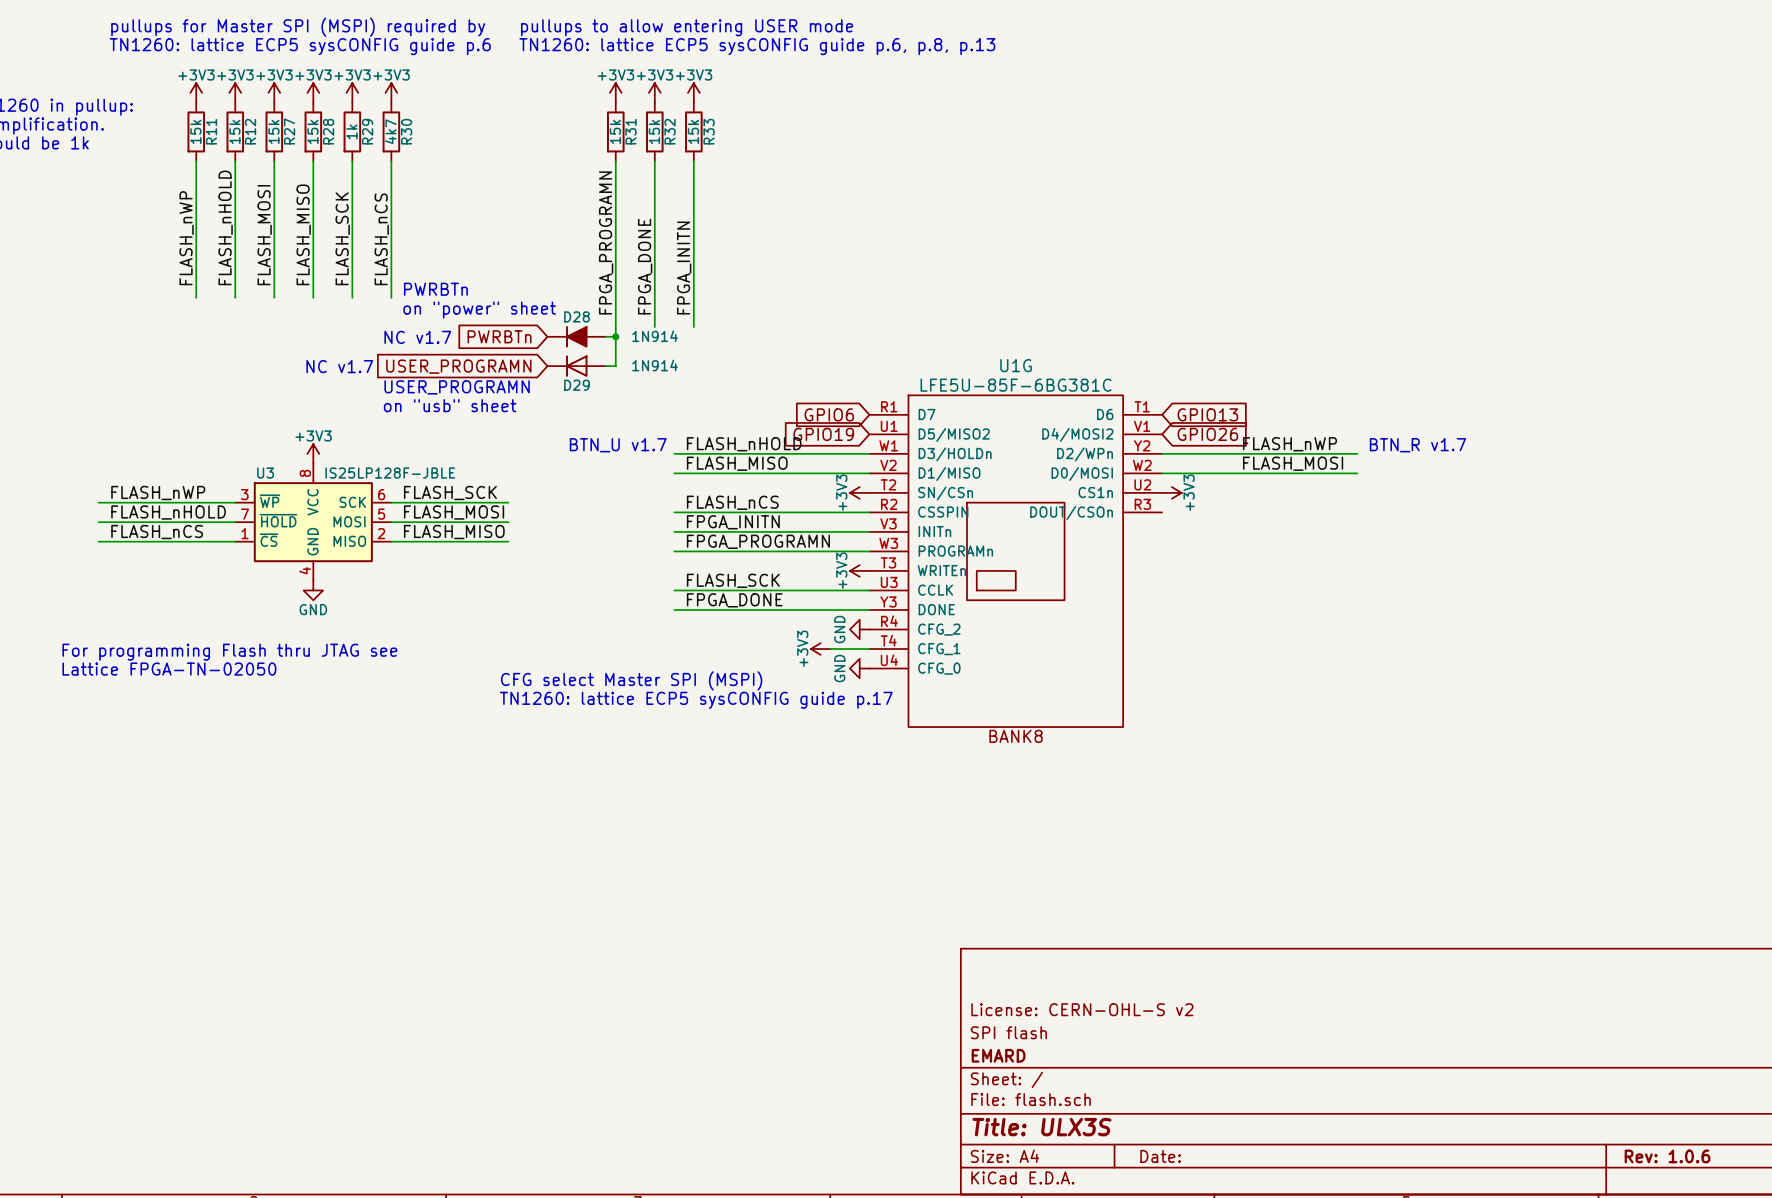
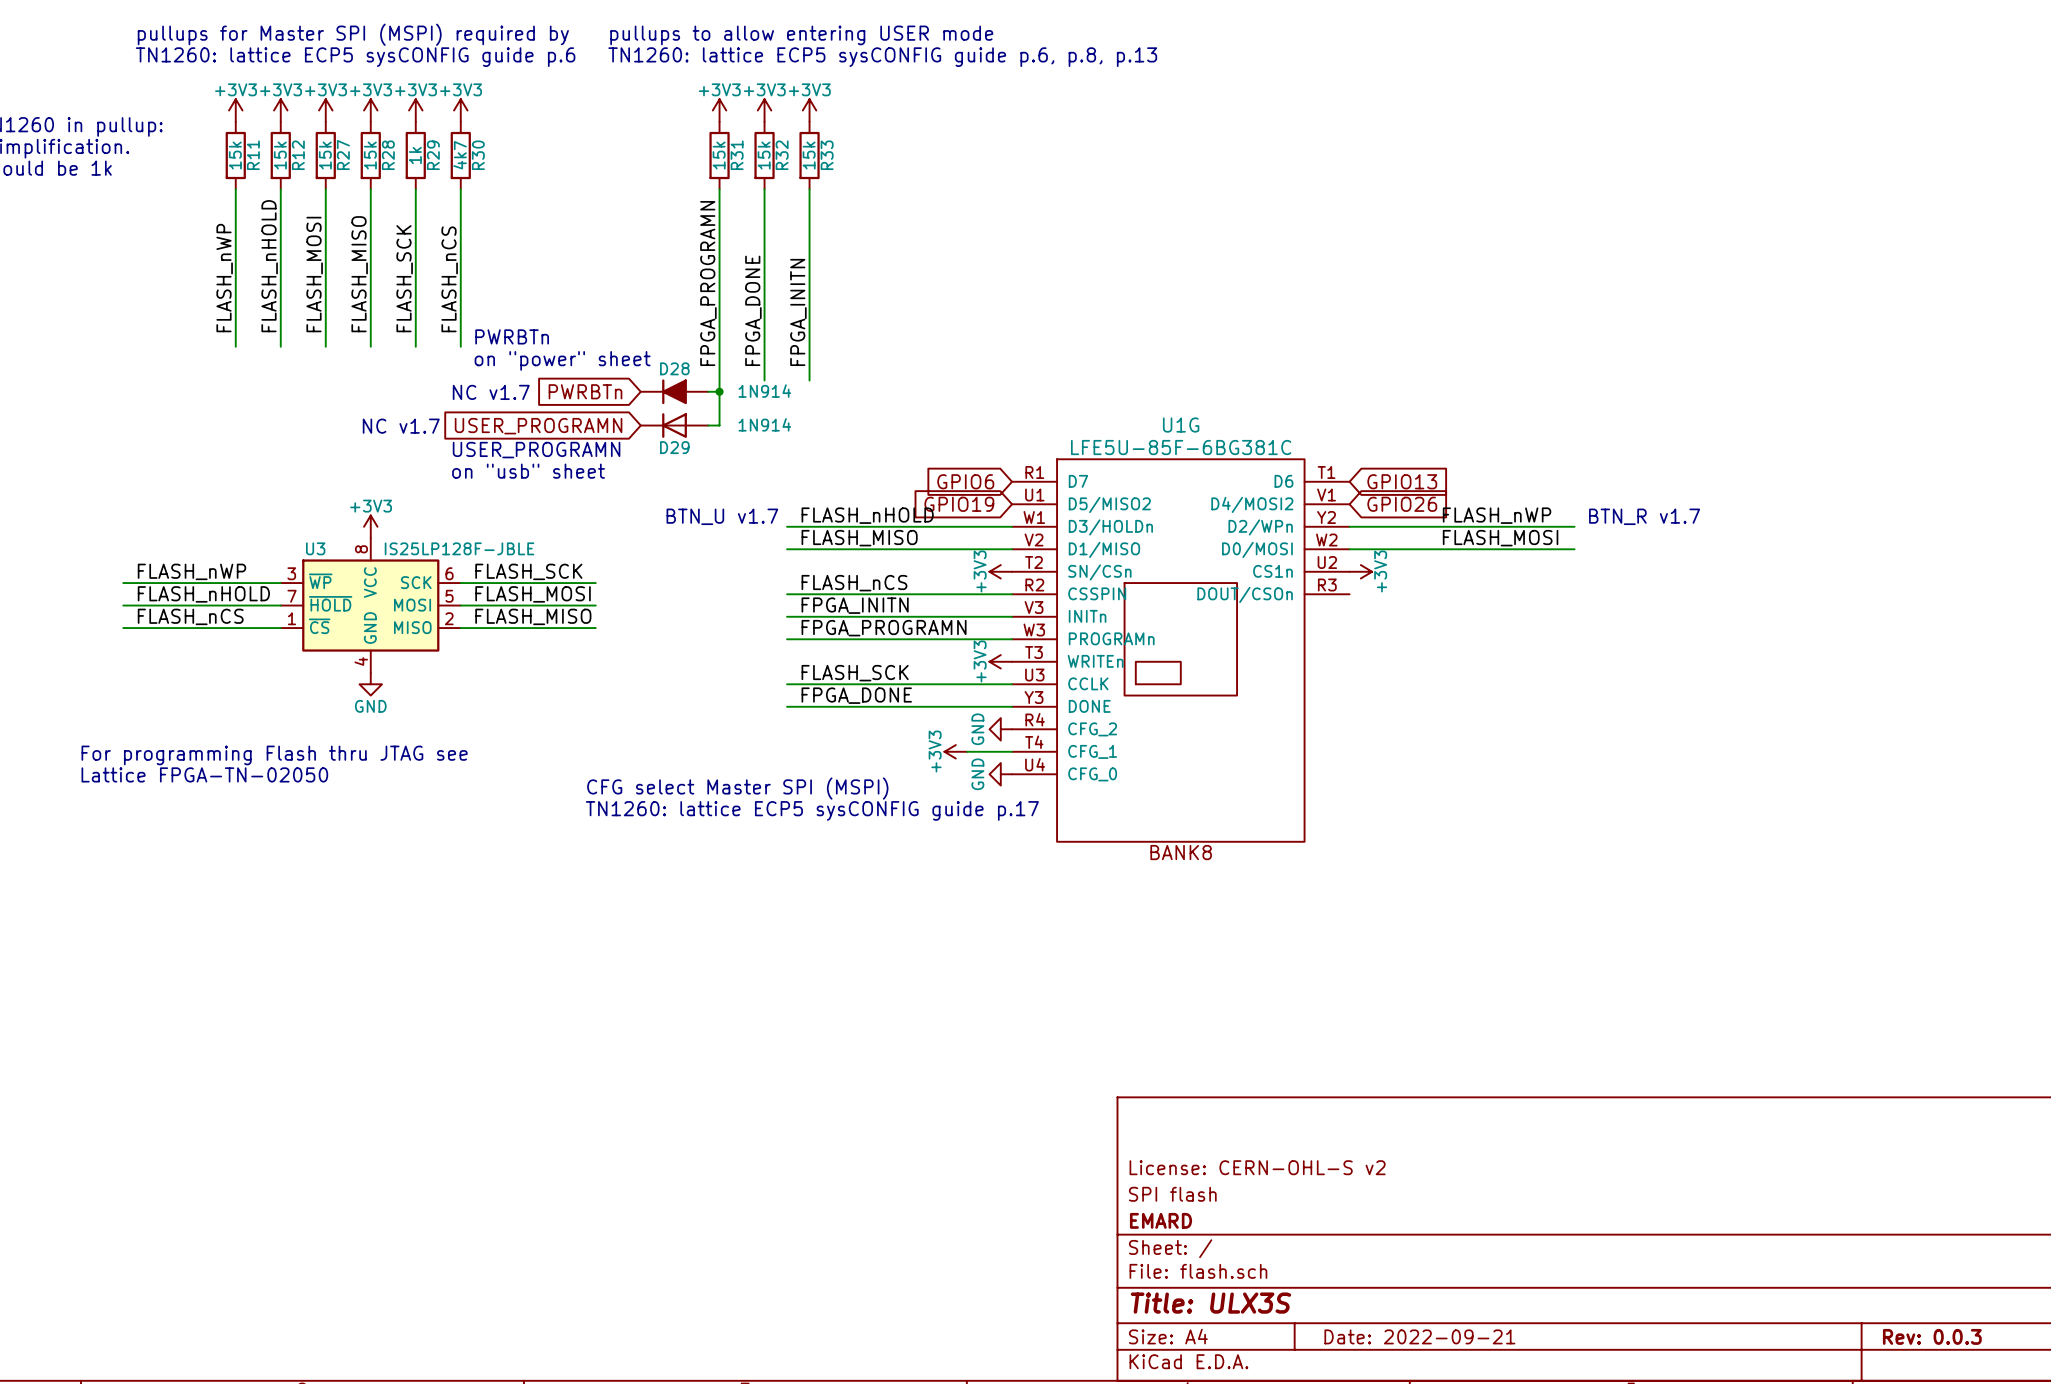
title block: Date: (1160, 1156) -> Date: 2022-09-21 (1419, 1336)
title block: Rev: 1.0.6 (1667, 1156) -> Rev: 0.0.3 (1932, 1336)

